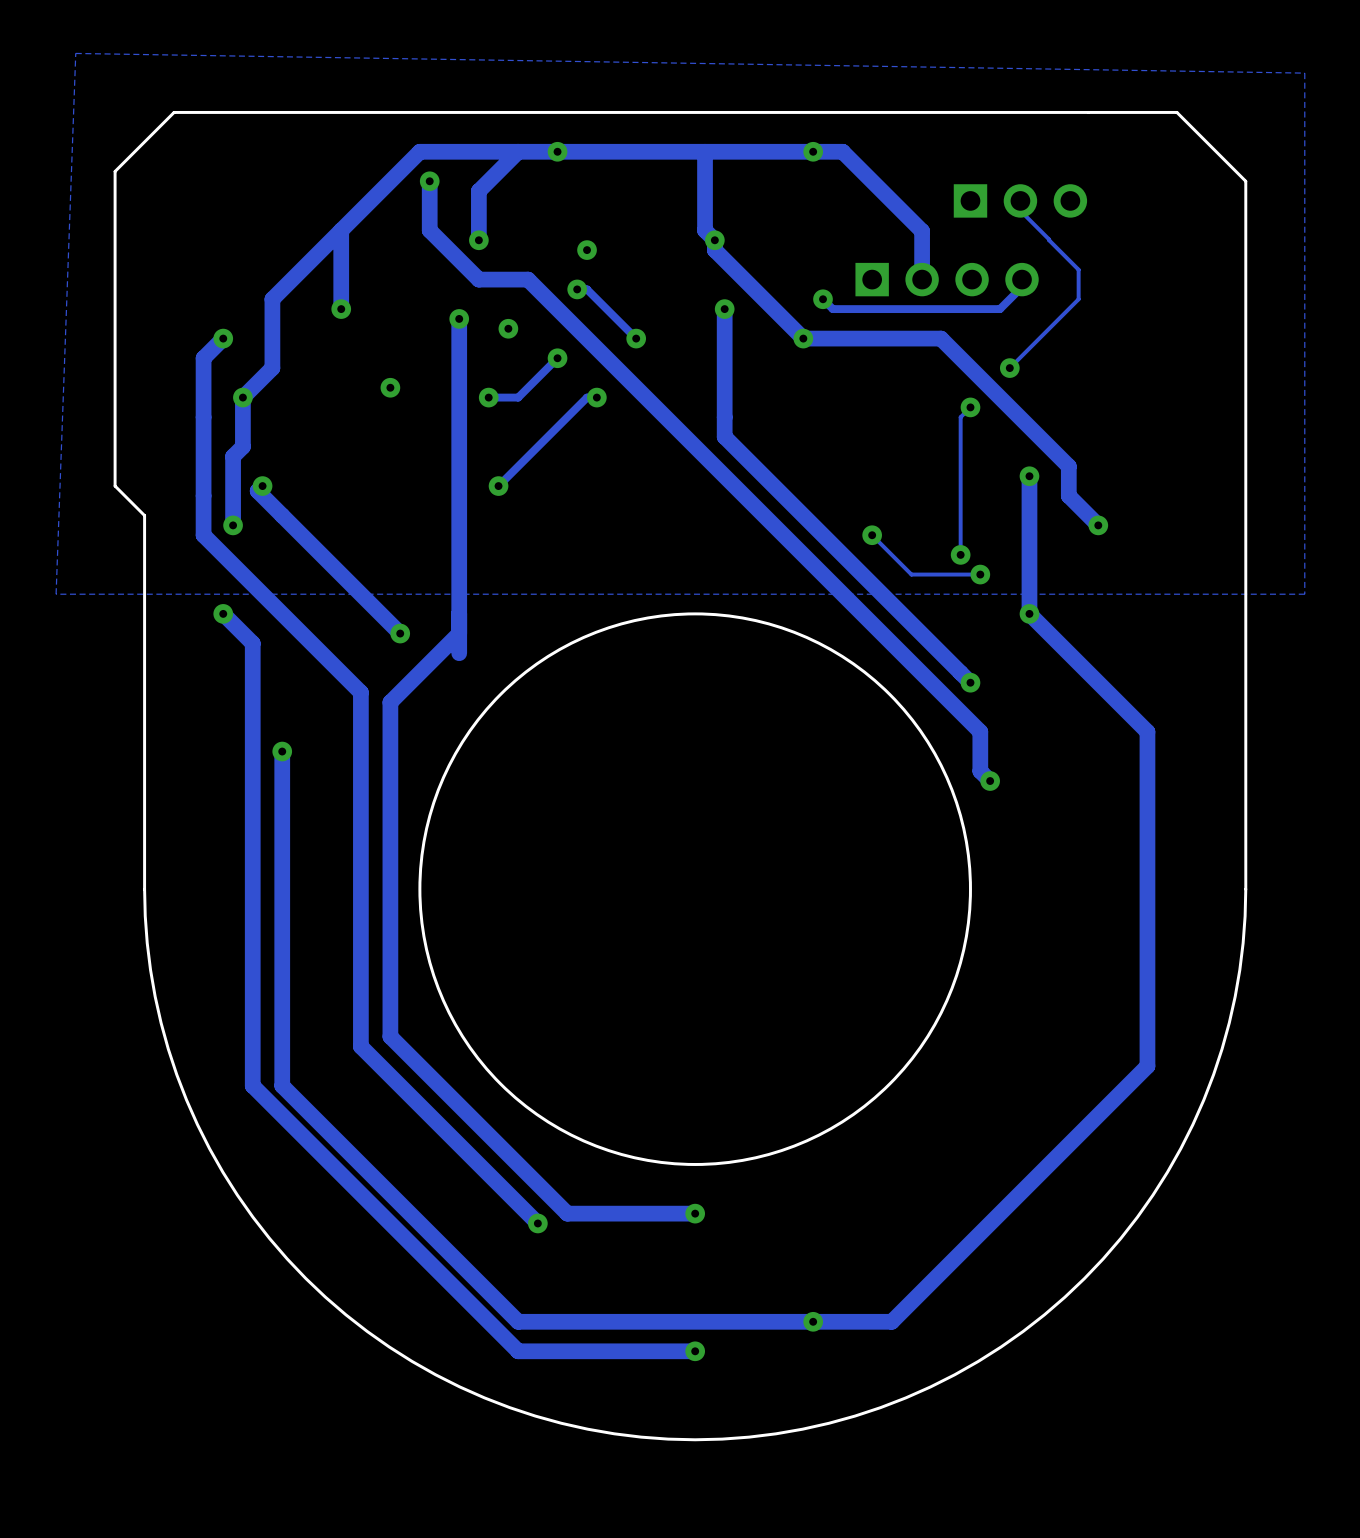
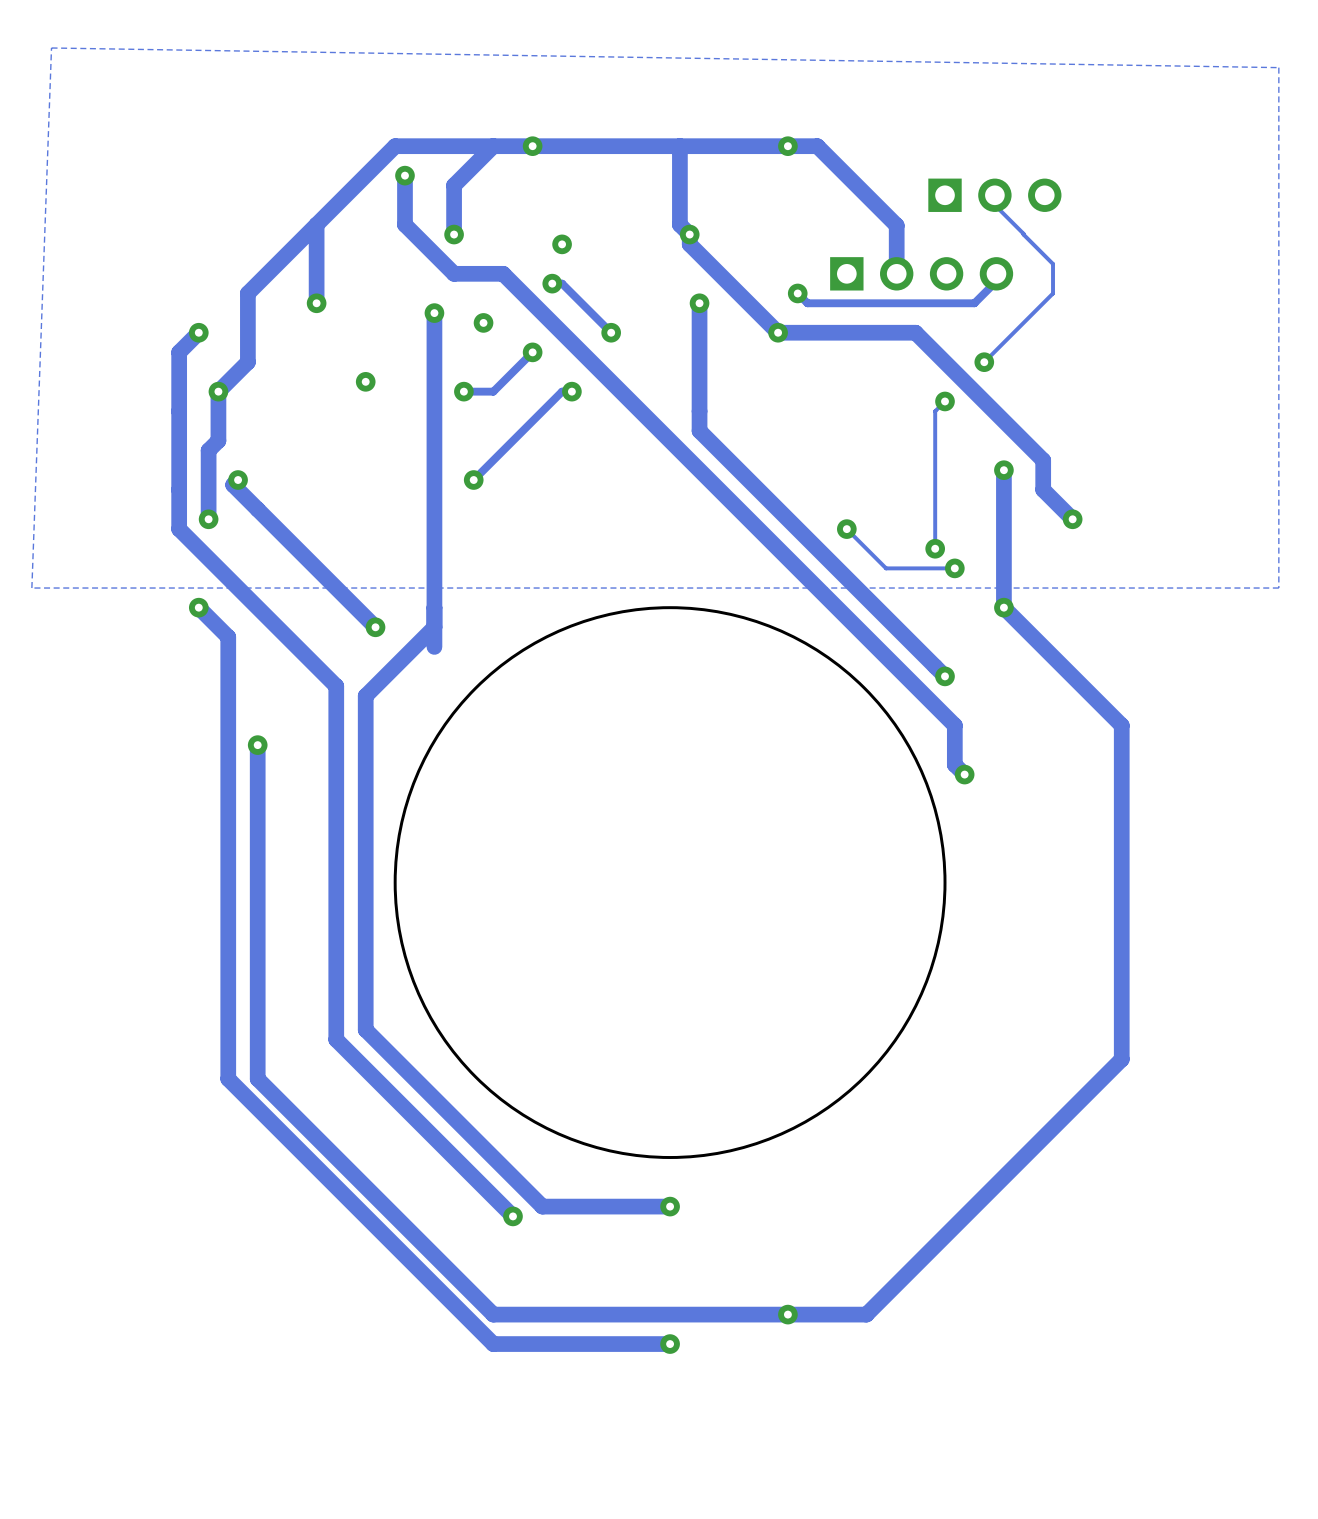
board edge: (1176, 112) (174, 112) (115, 171) (115, 486) (144, 515) (145, 916) (150, 969) (161, 1022) (176, 1074) (197, 1124) (222, 1172) (252, 1217) (287, 1258) (325, 1297) (367, 1331) (412, 1361) (459, 1386) (509, 1407) (561, 1423) (614, 1433) (668, 1439) (722, 1439) (775, 1433) (828, 1423) (880, 1407) (930, 1386) (978, 1361) (1023, 1331) (1064, 1297) (1103, 1258) (1137, 1217) (1167, 1172) (1192, 1124) (1222, 1049) (1239, 969) (1245, 889) (1245, 181) (1176, 112) -> none

